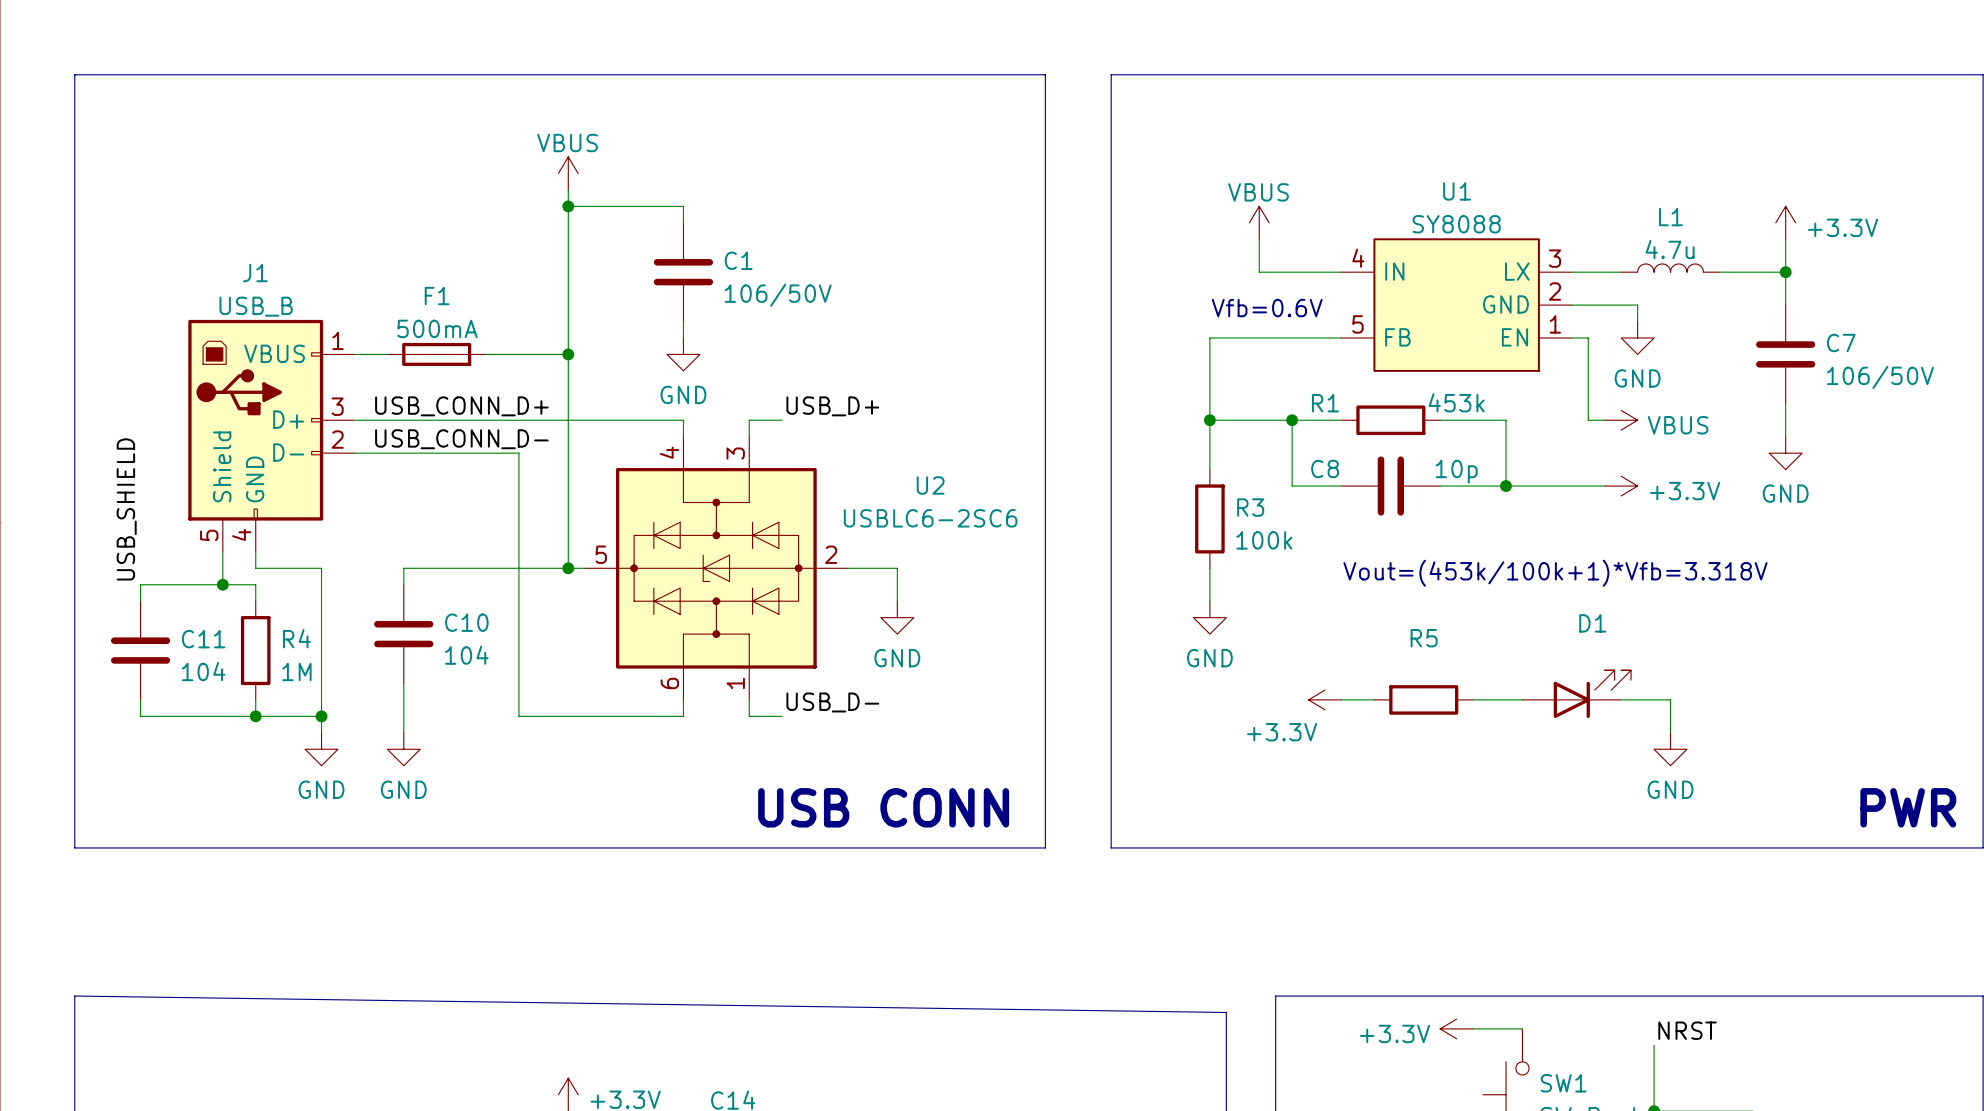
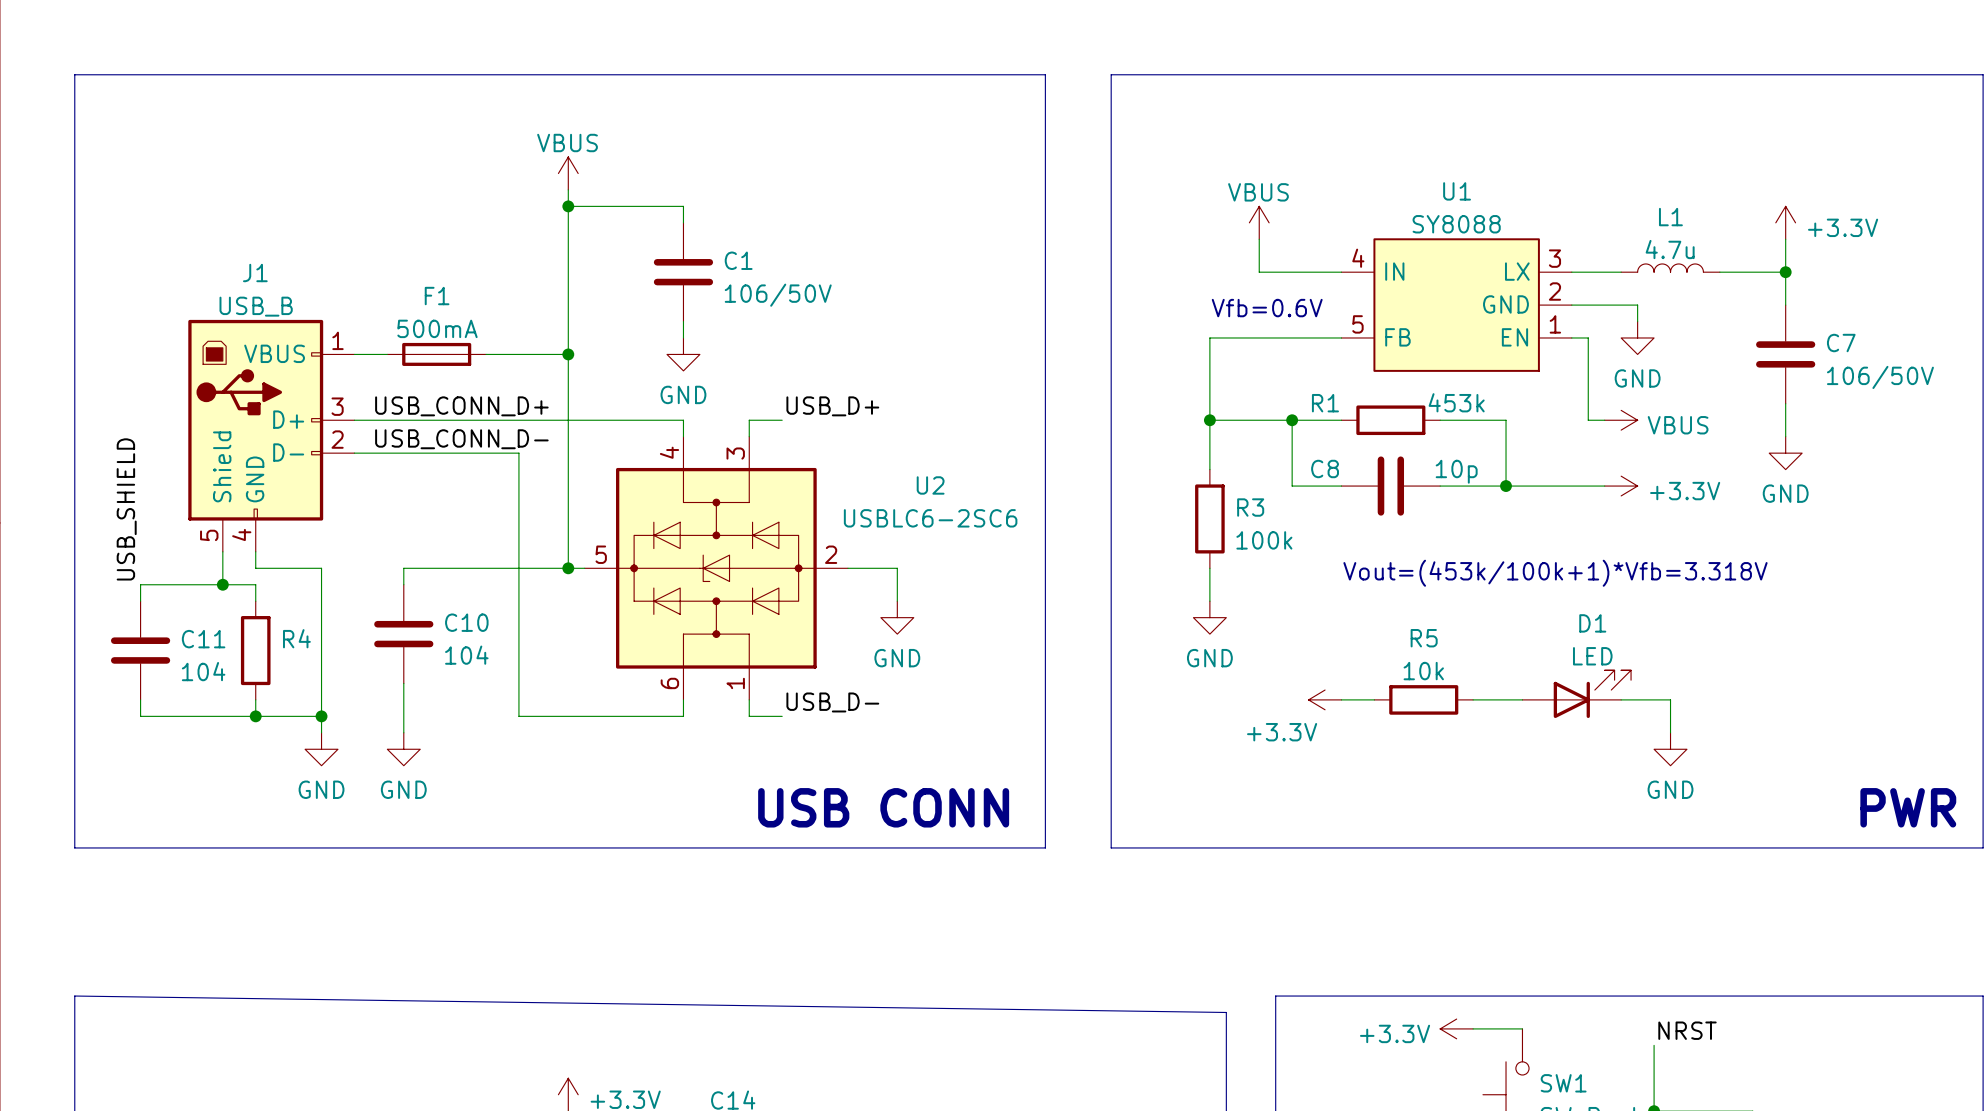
D1 value: none -> LED (1592, 656)
R4 value: 1M (296, 671) -> none
R5 value: none -> 10k (1423, 671)

